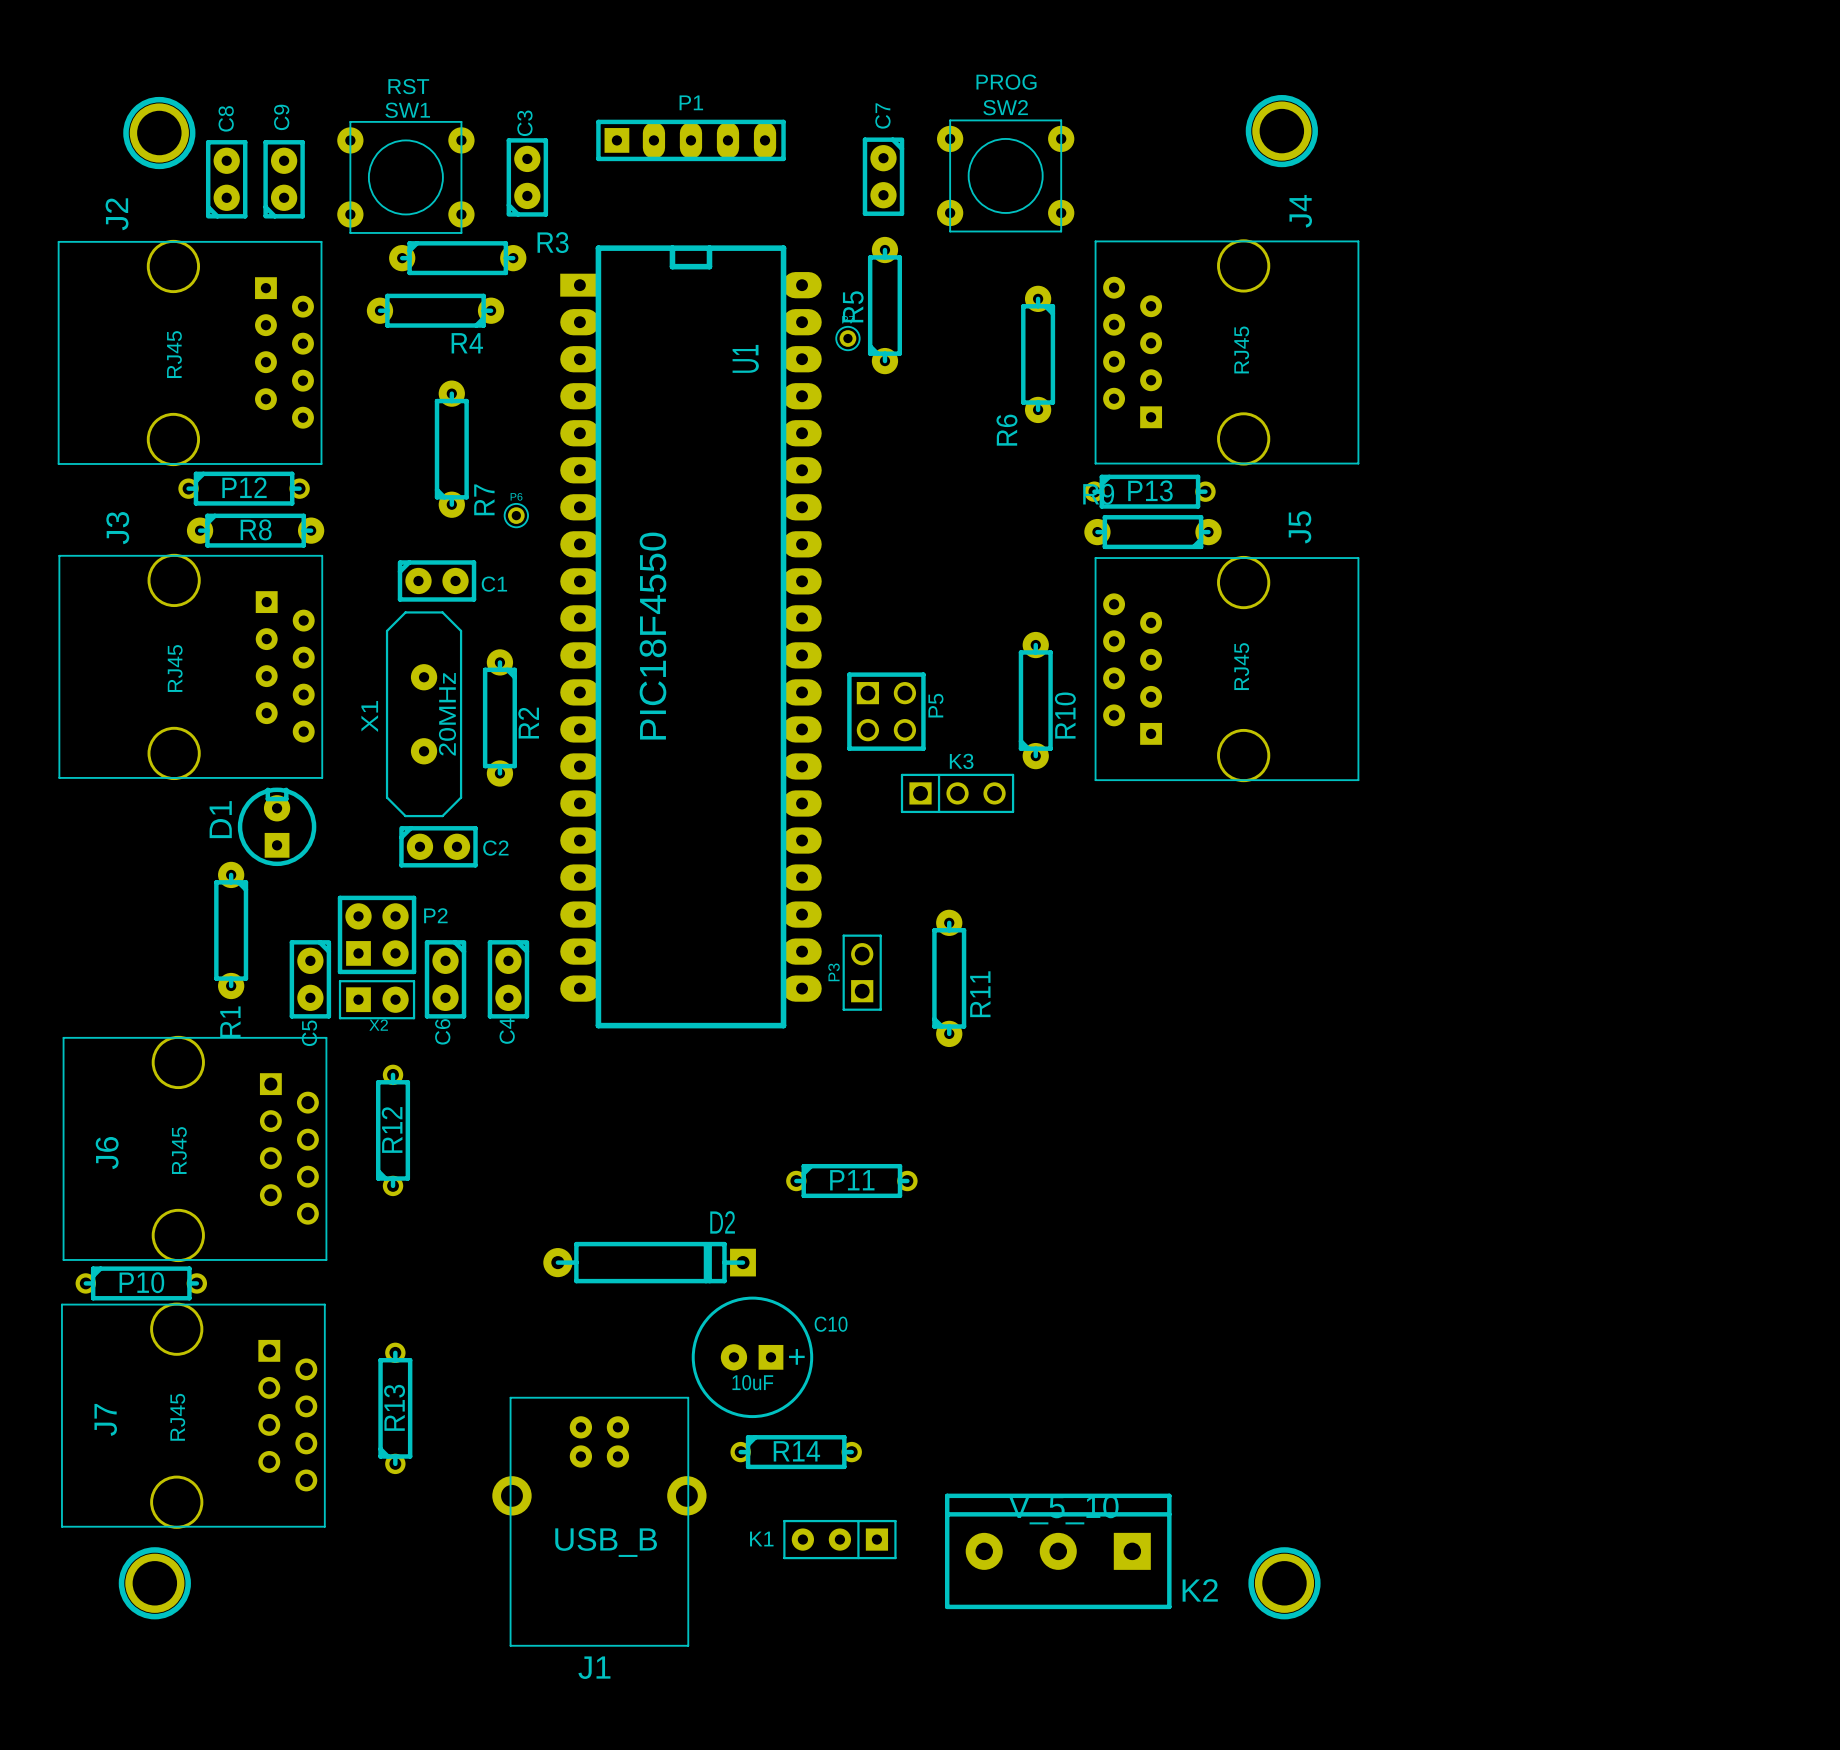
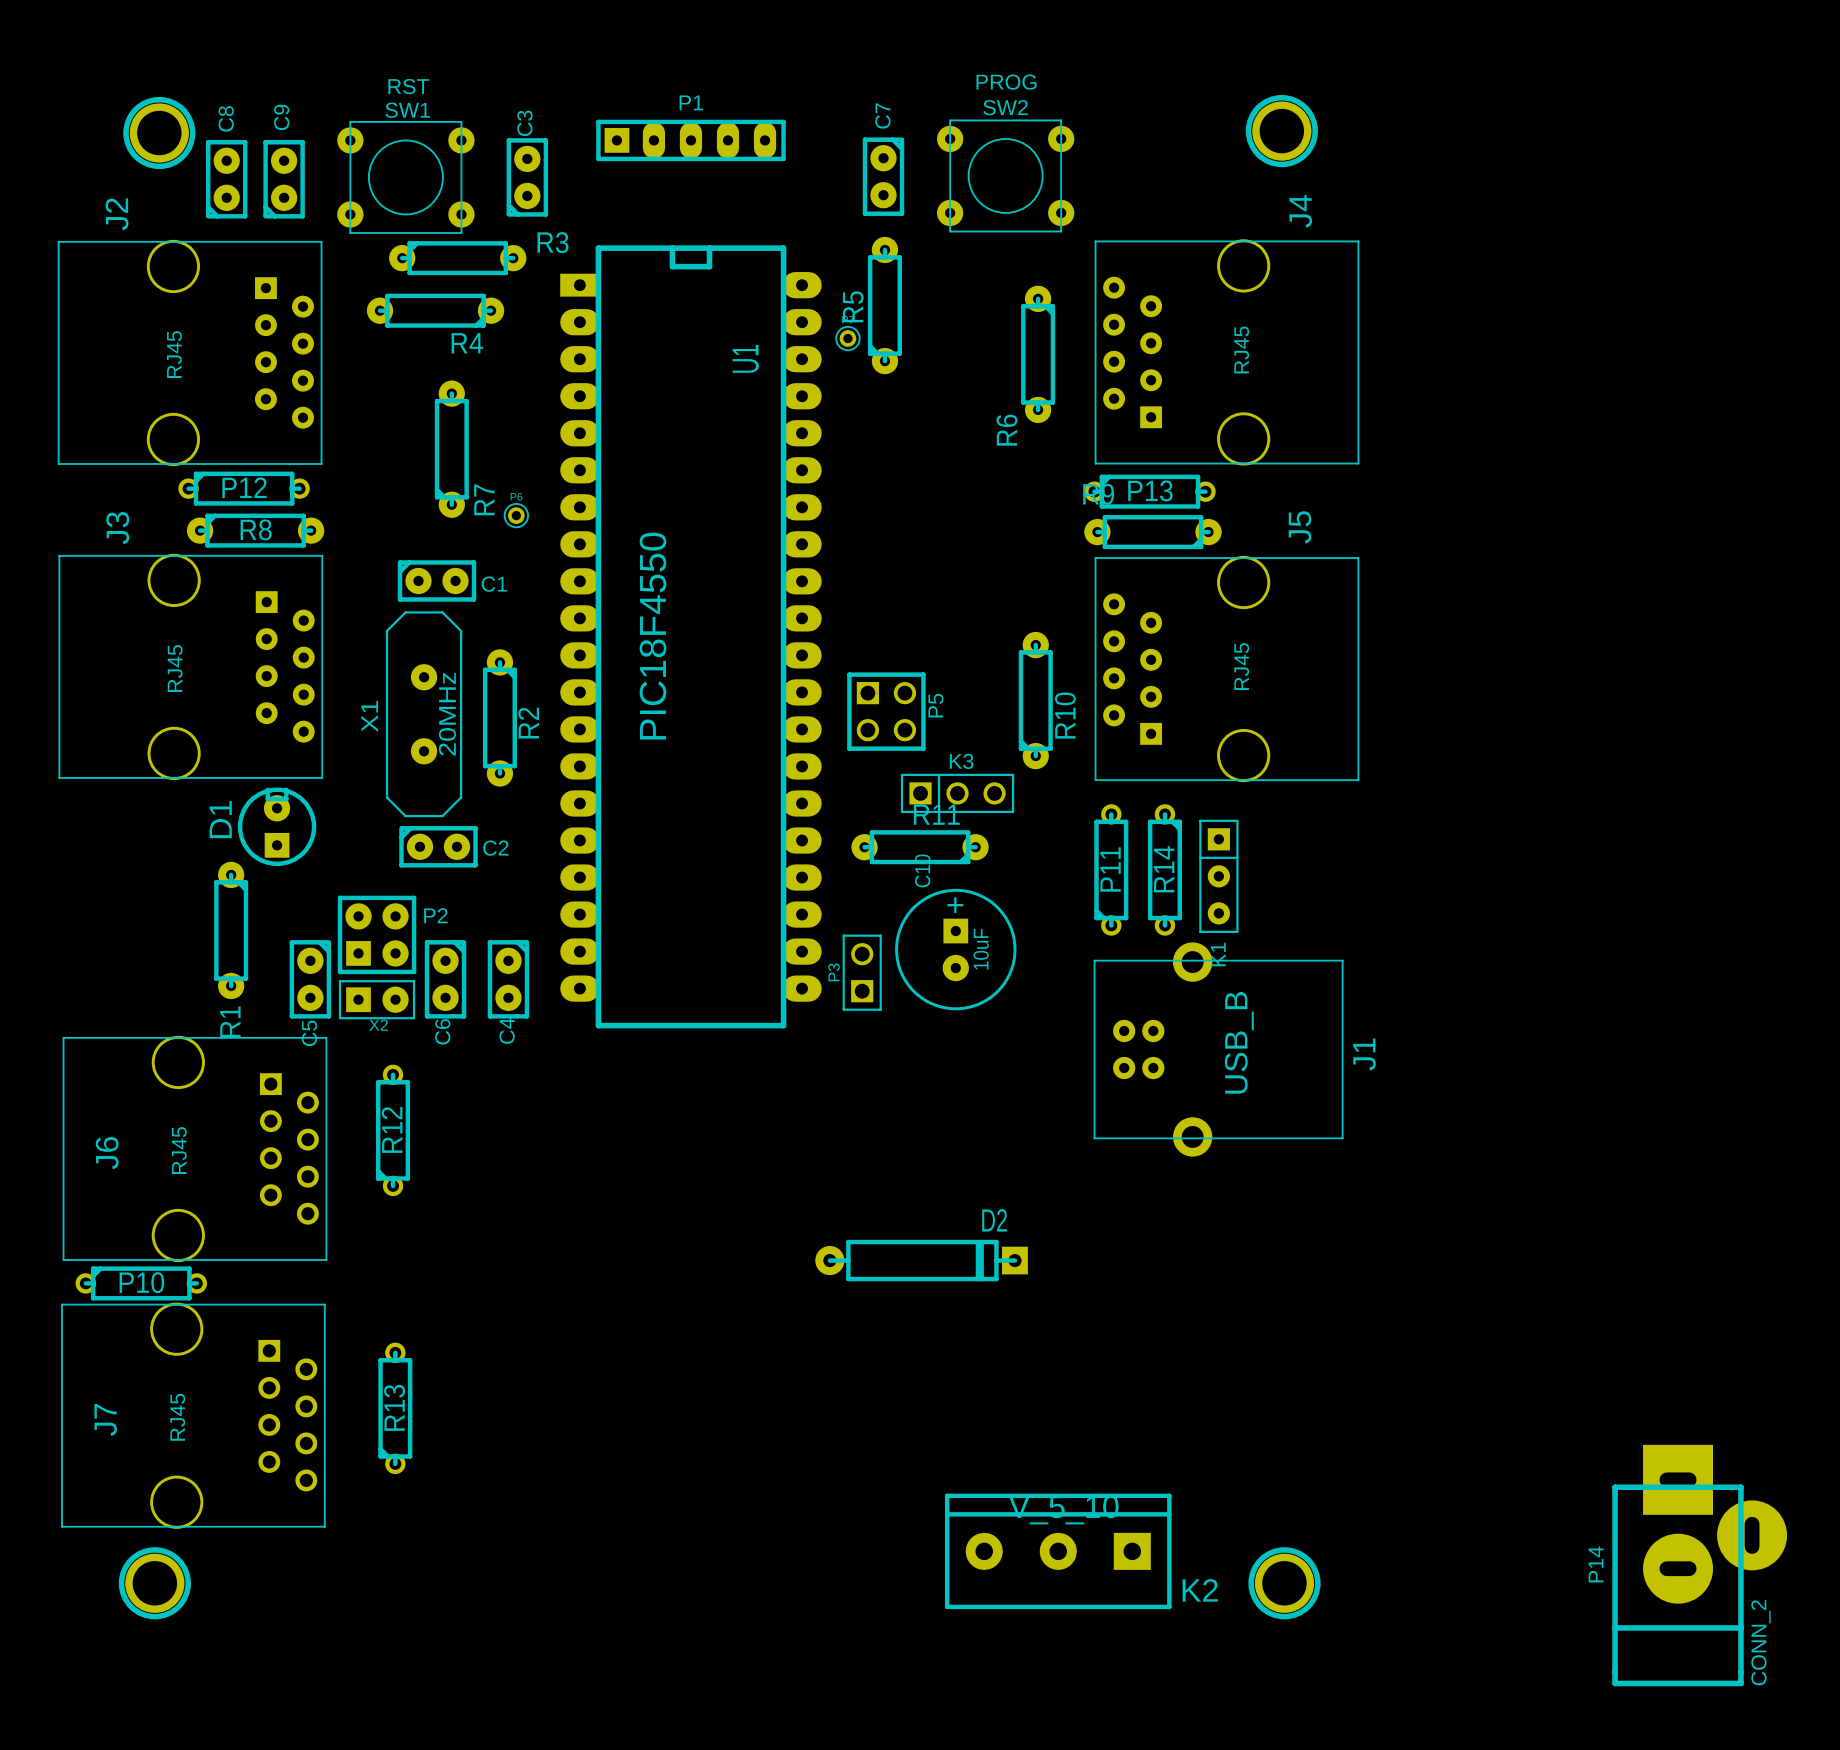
R11 rotation: 0° (949, 978) -> 90° counterclockwise (920, 847)
R11 position: (949, 978) -> (920, 847)
P11 rotation: 0° (851, 1181) -> 90° counterclockwise (1111, 869)
P11 position: (851, 1181) -> (1111, 869)
D2 position: (649, 1262) -> (921, 1260)
C10 rotation: 0° (752, 1357) -> 90° counterclockwise (955, 949)
C10 position: (752, 1357) -> (955, 949)
R14 rotation: 0° (796, 1452) -> 90° clockwise (1164, 869)
R14 position: (796, 1452) -> (1164, 869)
J1 rotation: 0° (599, 1521) -> 90° counterclockwise (1218, 1049)
J1 position: (599, 1521) -> (1218, 1049)
K1 rotation: 0° (839, 1539) -> 90° counterclockwise (1218, 876)
K1 position: (839, 1539) -> (1218, 876)
P14: none -> CONN_2 (1699, 1565)

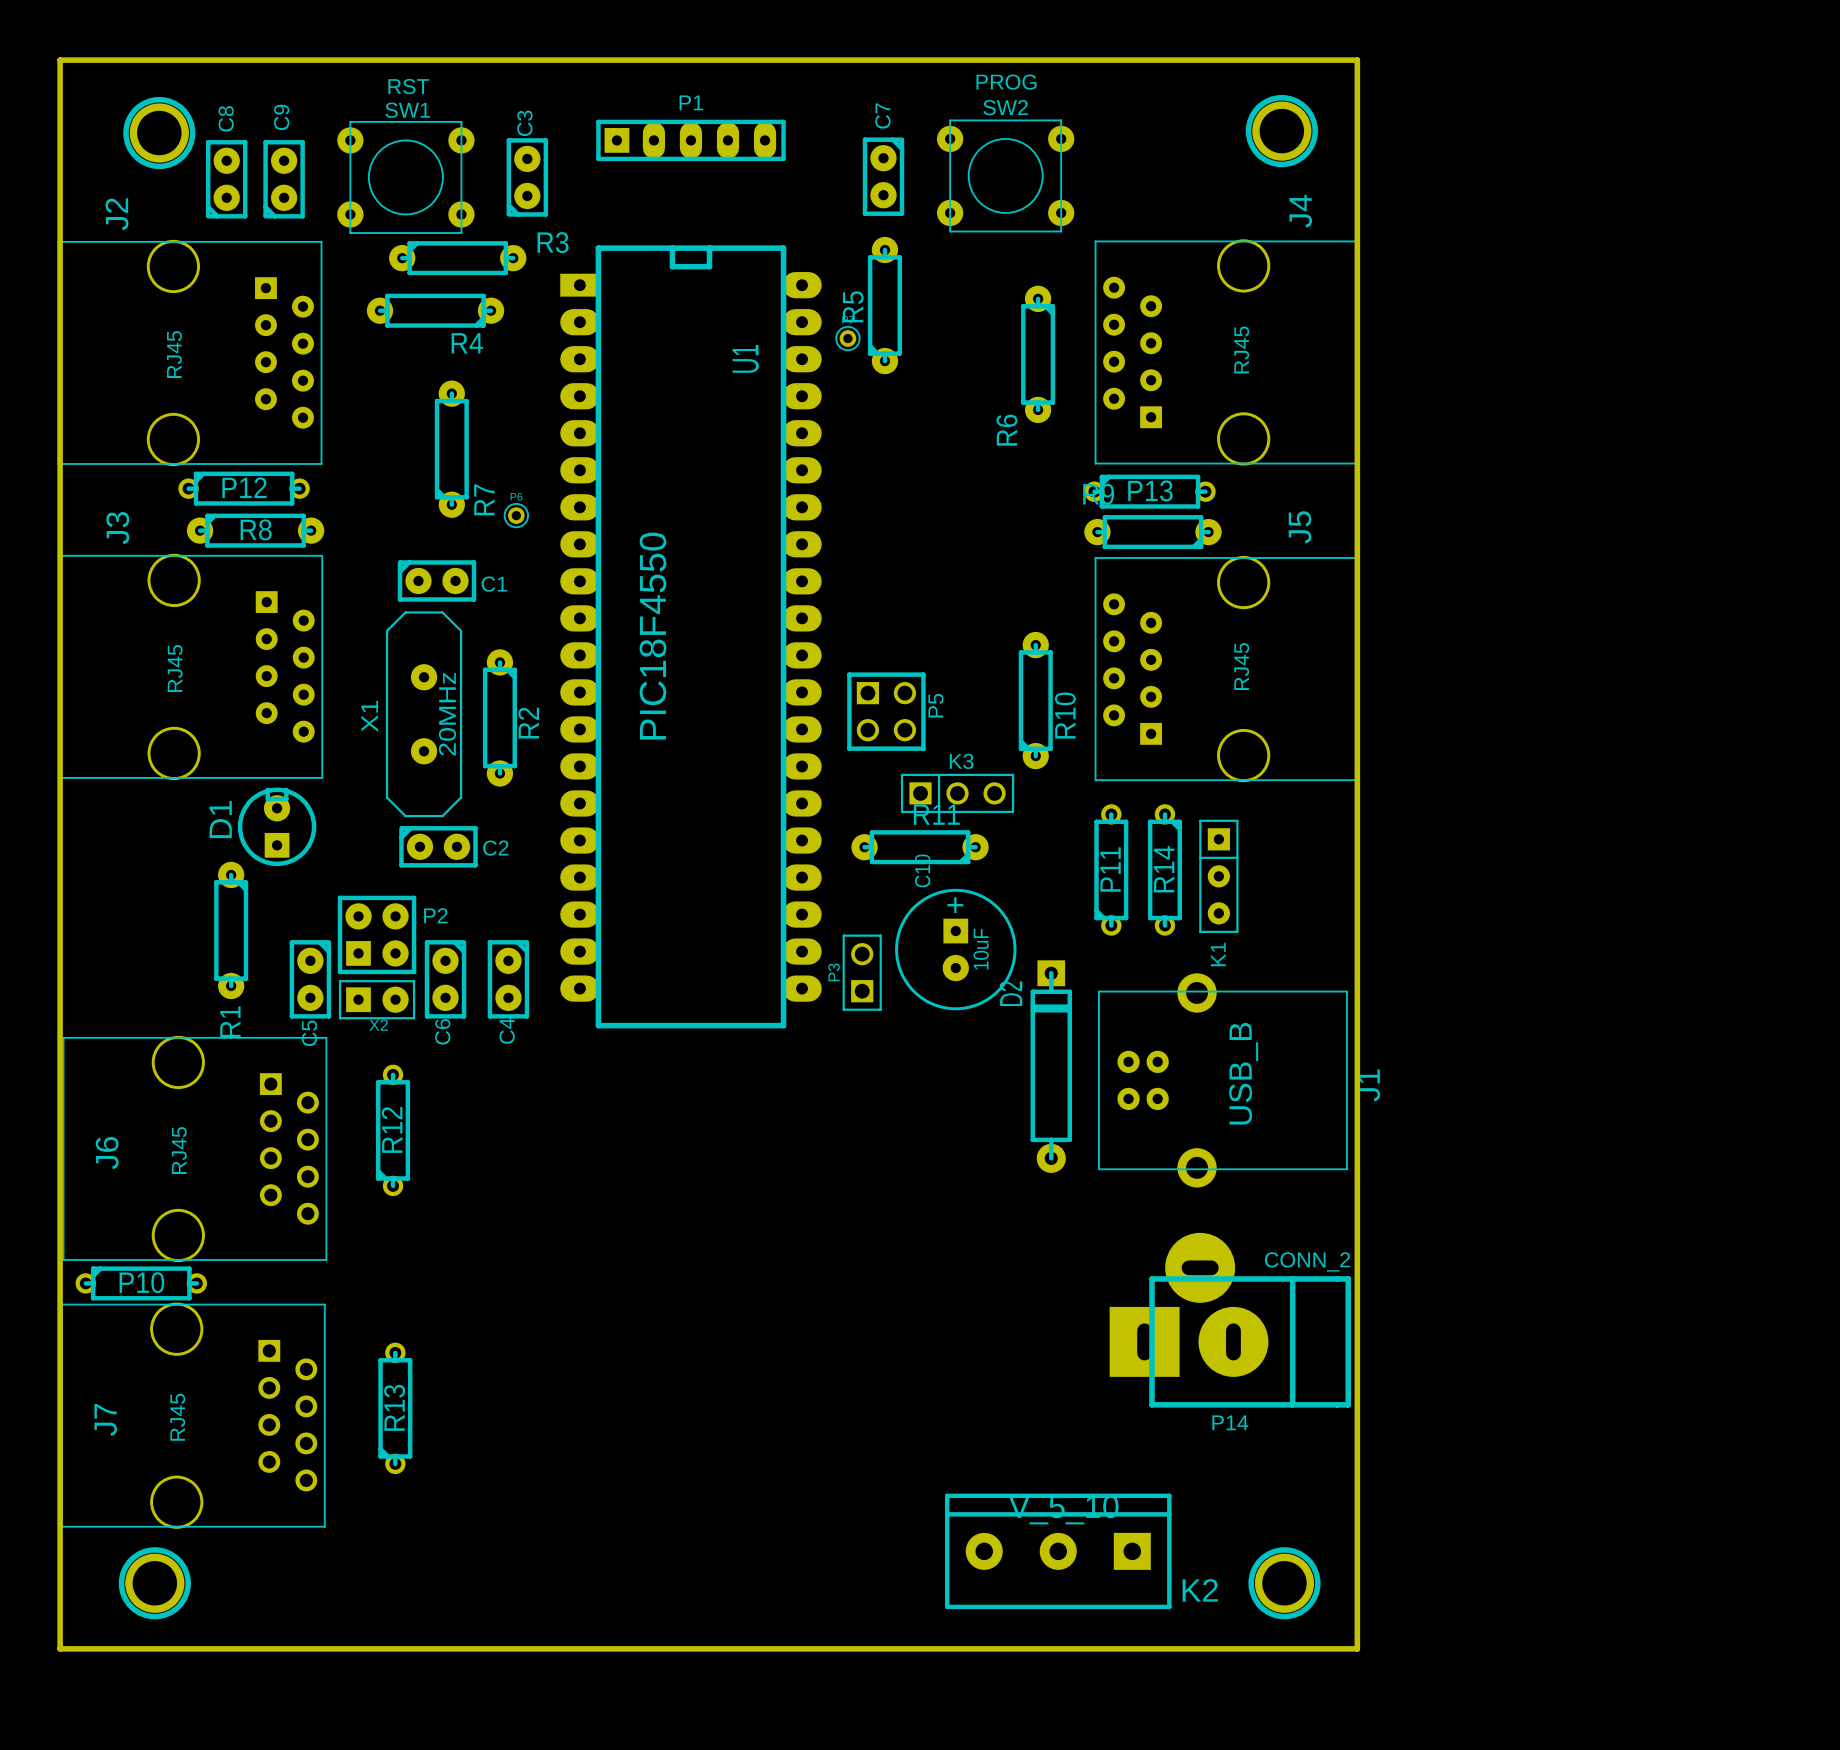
board edge: none -> (60, 60) (1357, 60) (1357, 1648) (60, 1648) (60, 60)
J1 position: (1218, 1049) -> (1222, 1080)
D2 rotation: 0° (921, 1260) -> 90° counterclockwise (1051, 1066)
D2 position: (921, 1260) -> (1051, 1066)
P14 rotation: 0° (1699, 1565) -> 90° counterclockwise (1230, 1320)
P14 position: (1699, 1565) -> (1230, 1320)

